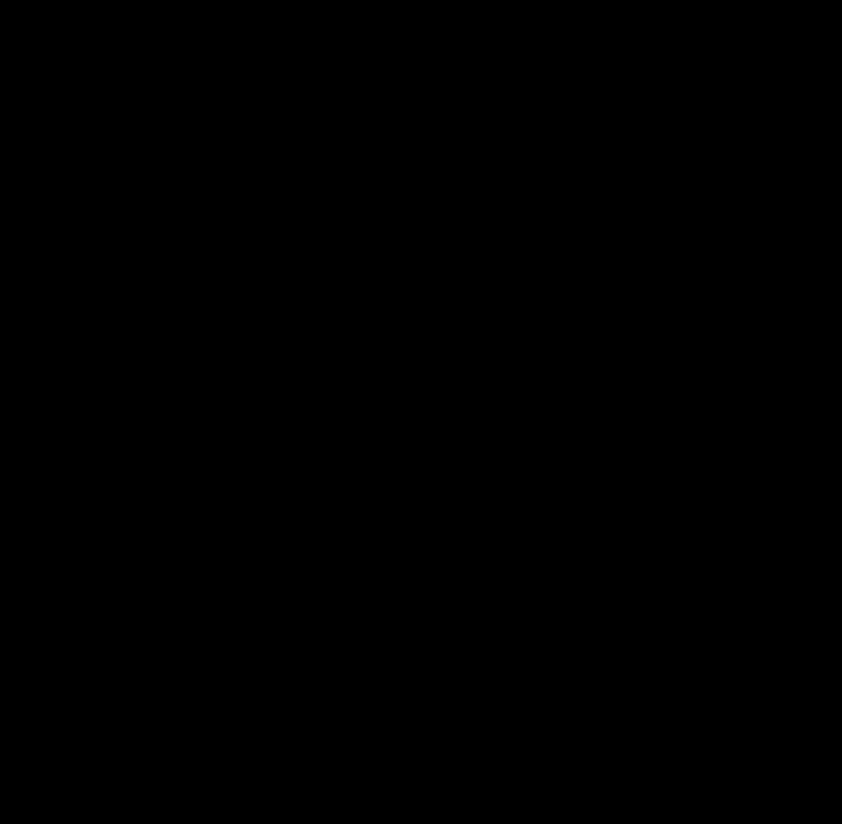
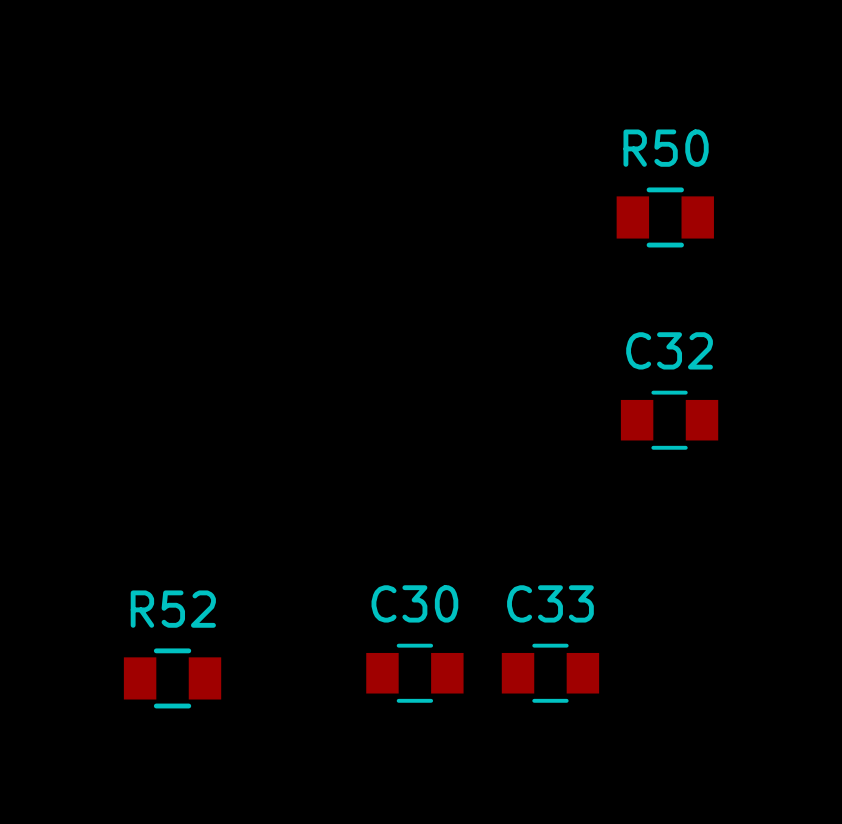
R50: none -> (665, 217)
C32: none -> (669, 420)
C30: none -> (414, 673)
C33: none -> (550, 673)
R52: none -> (172, 678)

